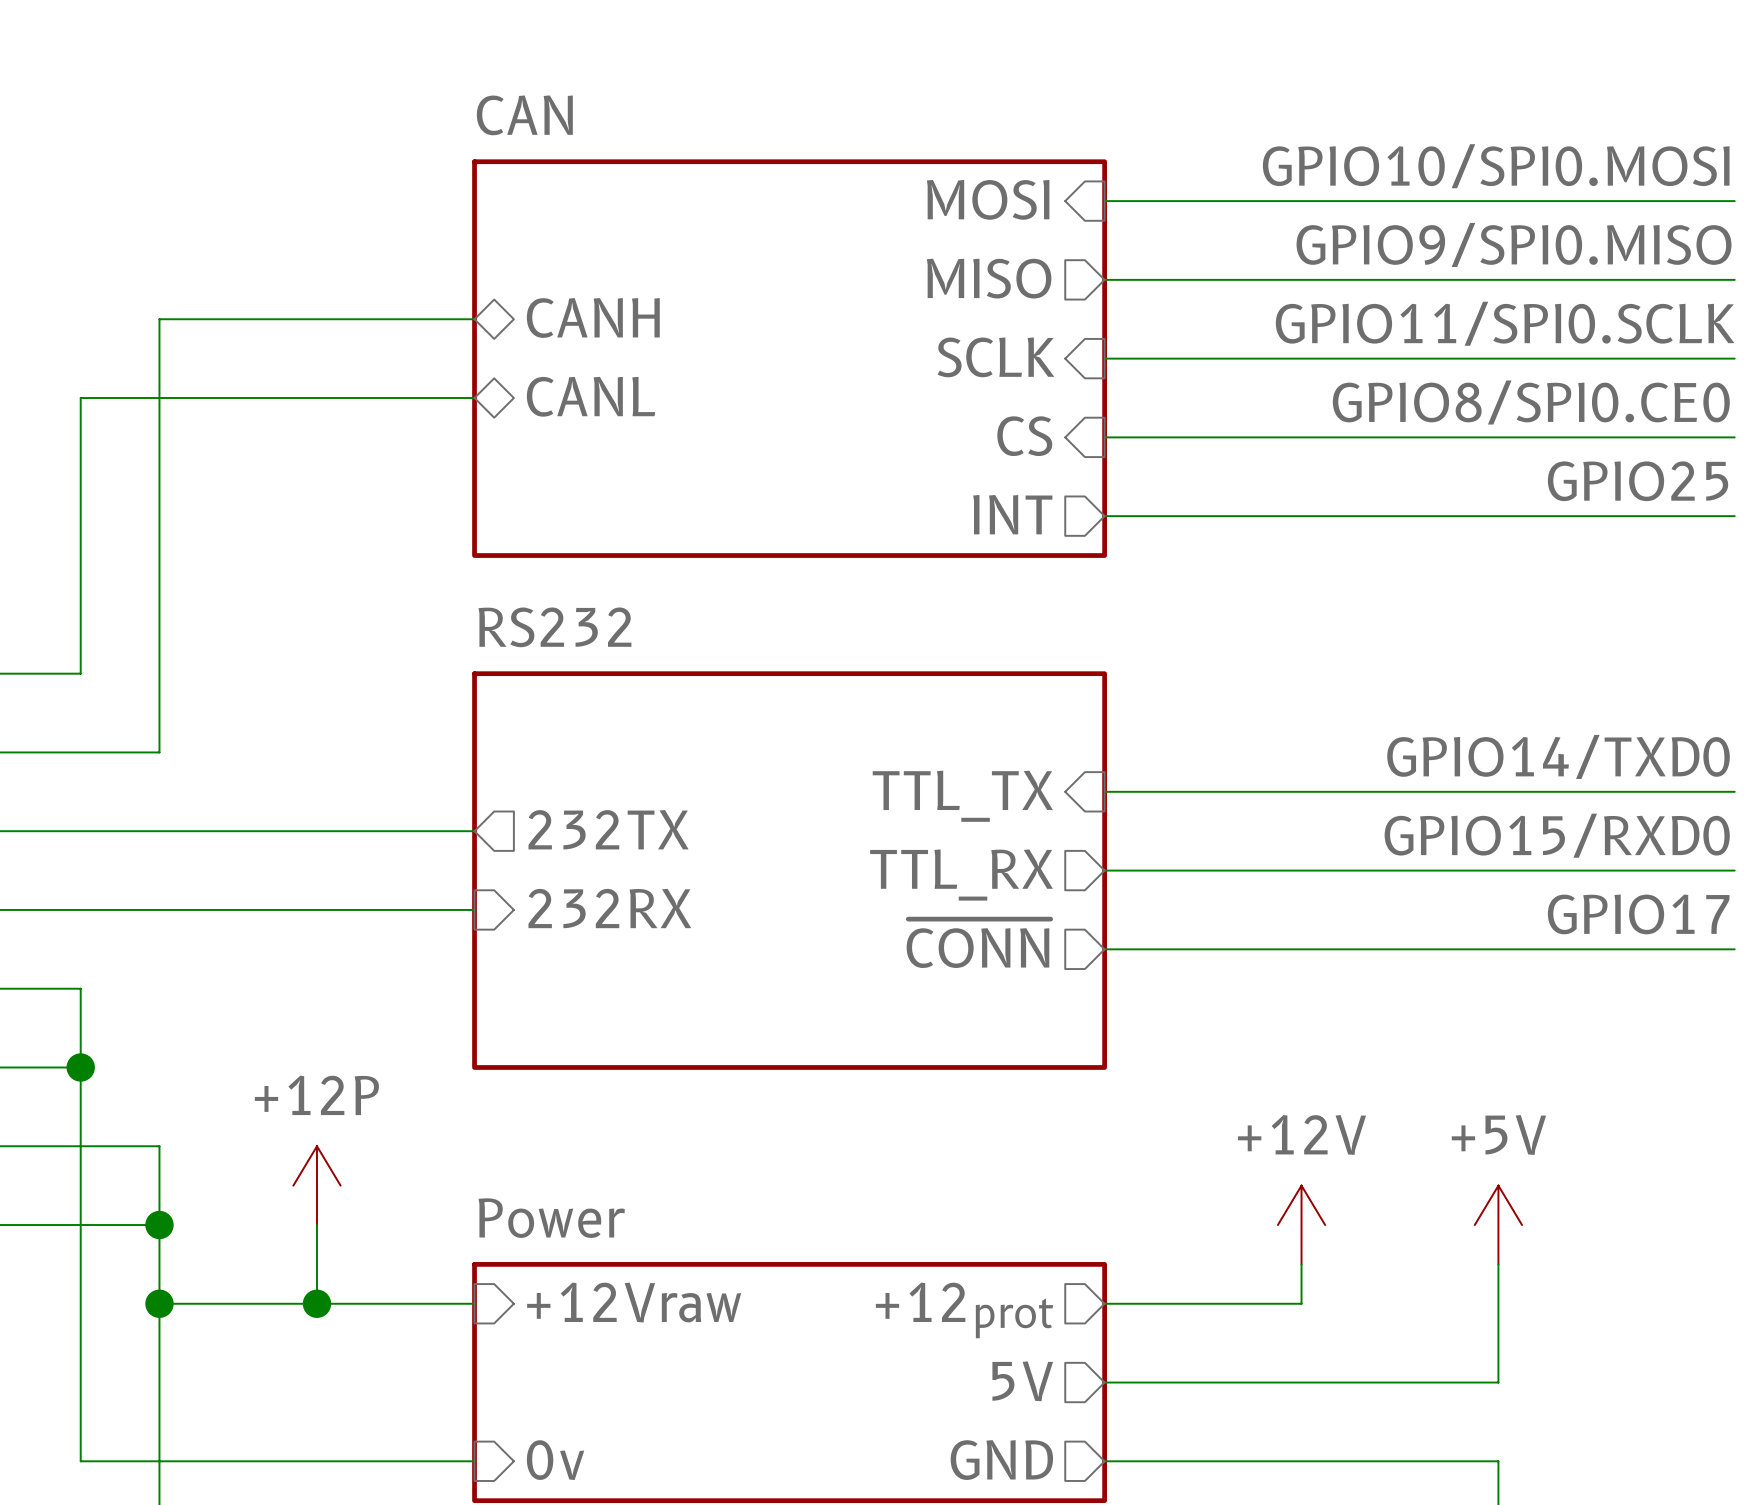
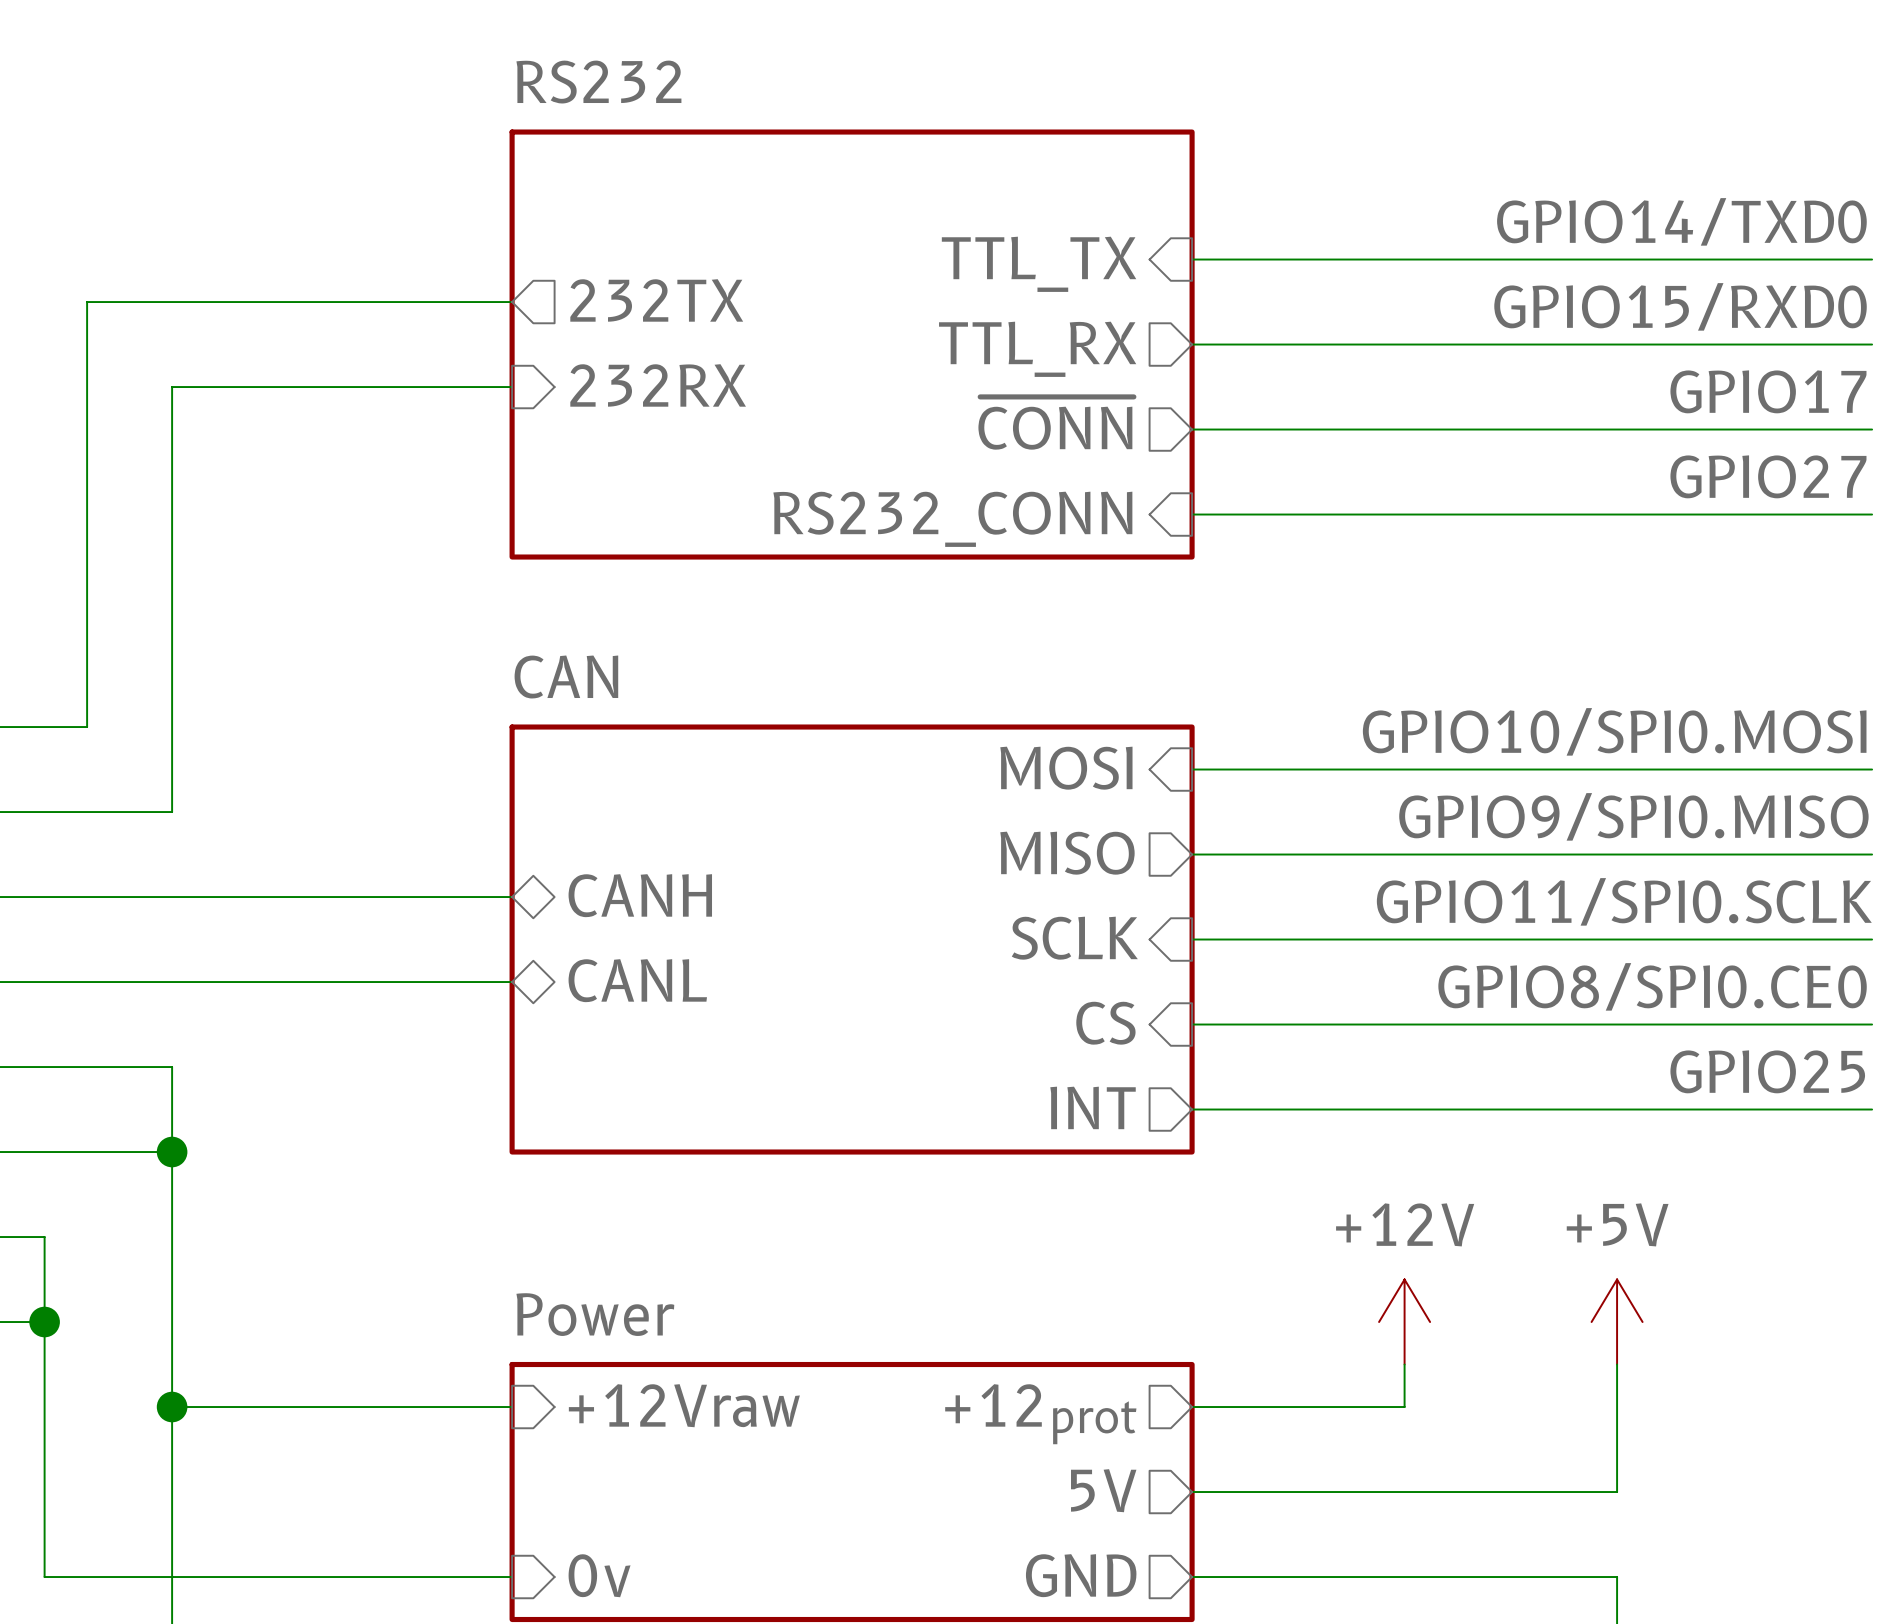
label position: GPIO10/SPI0.MOSI (1496, 166) -> GPIO10/SPI0.MOSI (1614, 731)
sheet pin position: MOSI (988, 199) -> MOSI (1066, 768)
wire: (1104, 201) (1734, 201) -> (1192, 259) (1872, 259)
label: none -> GPIO14/TXD0 (1681, 221)
sheet pin: none -> TTL_TX (1039, 264)
label: GPIO9/SPI0.MISO (1514, 244) -> none
sheet pin: none -> 232TX (656, 300)
sheet pin: MISO (989, 278) -> none
wire: (1104, 279) (1734, 279) -> (1192, 344) (1872, 344)
label: none -> GPIO15/RXD0 (1680, 306)
sheet pin: CANH (593, 317) -> none
wire: (474, 319) (159, 319) (159, 358) -> (512, 387) (172, 387)
sheet RS232: none -> (852, 344)
sheet pin: none -> TTL_RX (1037, 349)
label: GPIO11/SPI0.SCLK (1505, 323) -> none
sheet pin: none -> 232RX (658, 385)
sheet pin: SCLK (995, 357) -> none
sheet CAN: (789, 358) -> none
wire: (1104, 358) (1734, 358) -> (1192, 769) (1872, 769)
label: none -> GPIO17 (1768, 391)
sheet pin: none -> ~{CONN} (1056, 423)
sheet pin: CANL (590, 396) -> none
wire: (80, 398) (474, 398) -> (87, 429) (87, 302) (512, 302)
label: GPIO8/SPI0.CE0 (1531, 402) -> none
sheet pin: CS (1024, 436) -> none
wire: (1104, 437) (1734, 437) -> (1192, 429) (1872, 429)
label: none -> GPIO27 (1768, 476)
sheet pin: none -> RS232_CONN (952, 519)
label position: GPIO25 (1638, 481) -> GPIO25 (1767, 1071)
sheet pin position: INT (1012, 514) -> INT (1093, 1107)
wire: (1104, 516) (1734, 516) -> (1192, 514) (1872, 514)
sheet RS232 name: RS232 (554, 627) -> CAN (566, 676)
label: GPIO14/TXD0 (1558, 756) -> GPIO9/SPI0.MISO (1633, 816)
sheet pin shape: input (962, 796) -> output (1067, 853)
sheet pin: TTL_TX (962, 796) -> MISO (1067, 853)
sheet pin shape: output (608, 829) -> bidirectional (640, 895)
sheet pin: 232TX (608, 829) -> CANH (640, 895)
label: GPIO15/RXD0 (1557, 835) -> GPIO11/SPI0.SCLK (1624, 901)
sheet pin shape: output (961, 875) -> input (1074, 938)
sheet pin: TTL_RX (961, 875) -> SCLK (1074, 938)
sheet pin shape: input (609, 908) -> bidirectional (637, 980)
sheet pin: 232RX (609, 908) -> CANL (637, 980)
label: GPIO17 (1638, 914) -> GPIO8/SPI0.CE0 (1652, 986)
sheet pin shape: output (978, 943) -> input (1105, 1023)
sheet pin: ~{CONN} (978, 943) -> CS (1105, 1023)
wire: (80, 988) (80, 1461) -> (44, 1237) (44, 1577) (87, 1577)
wire: none -> (1192, 1109) (1872, 1109)
wire: none -> (87, 1152) (172, 1152)
junction: (80, 1067) -> none
junction: none -> (172, 1152)
wire: (41, 1146) (159, 1146) -> (87, 1067) (172, 1067) (172, 1237)
power symbol: +12P (316, 1185) -> none
wire: (41, 1225) (159, 1225) -> none
junction: none -> (44, 1322)
junction: (159, 1225) -> none
wire: (316, 1225) (316, 1303) -> none
junction: (316, 1303) -> none

